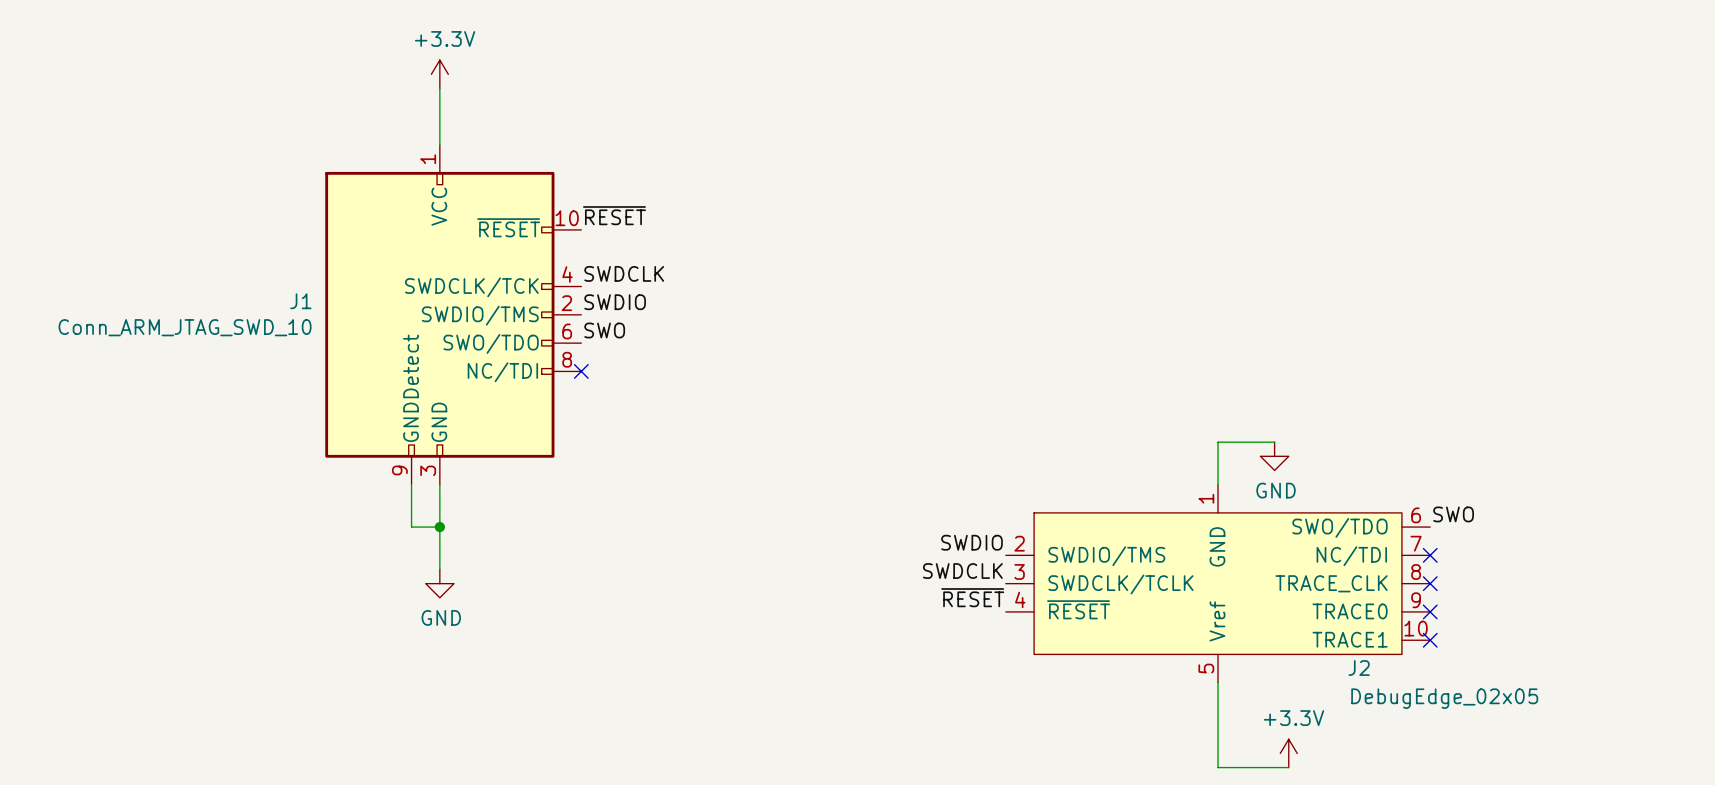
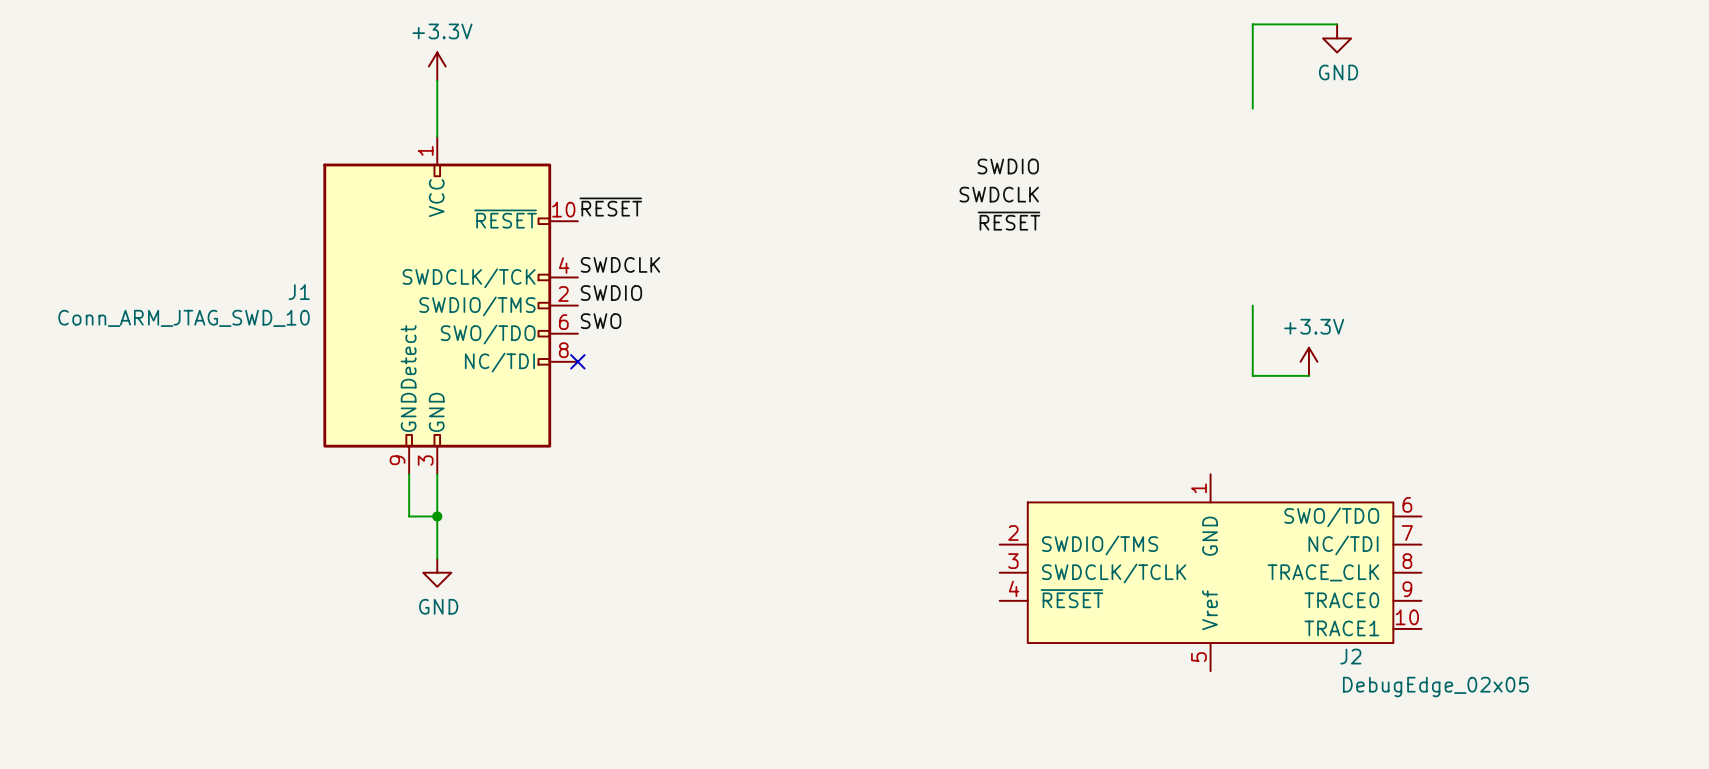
wire: none -> (1337, 24) (1252, 24) (1252, 108)
power symbol: none -> GND (1337, 38)
label: none -> SWDIO (1008, 166)
label: none -> SWDCLK (999, 194)
label: none -> ~{RESET} (1008, 221)
wire: none -> (1252, 305) (1252, 375) (1308, 375)
power symbol: none -> +3.3V (1308, 361)
wire: (1274, 442) (1218, 442) (1218, 484) -> none
power symbol: GND (1274, 456) -> none
label: SWO (1453, 514) -> none
label: SWDIO (971, 542) -> none
no-connect mark: (1430, 555) -> none
label: SWDCLK (962, 571) -> none
no-connect mark: (1430, 583) -> none
label: ~{RESET} (972, 597) -> none
no-connect mark: (1430, 611) -> none
no-connect mark: (1430, 640) -> none
wire: (1218, 682) (1218, 767) (1288, 767) -> none
power symbol: +3.3V (1288, 753) -> none

